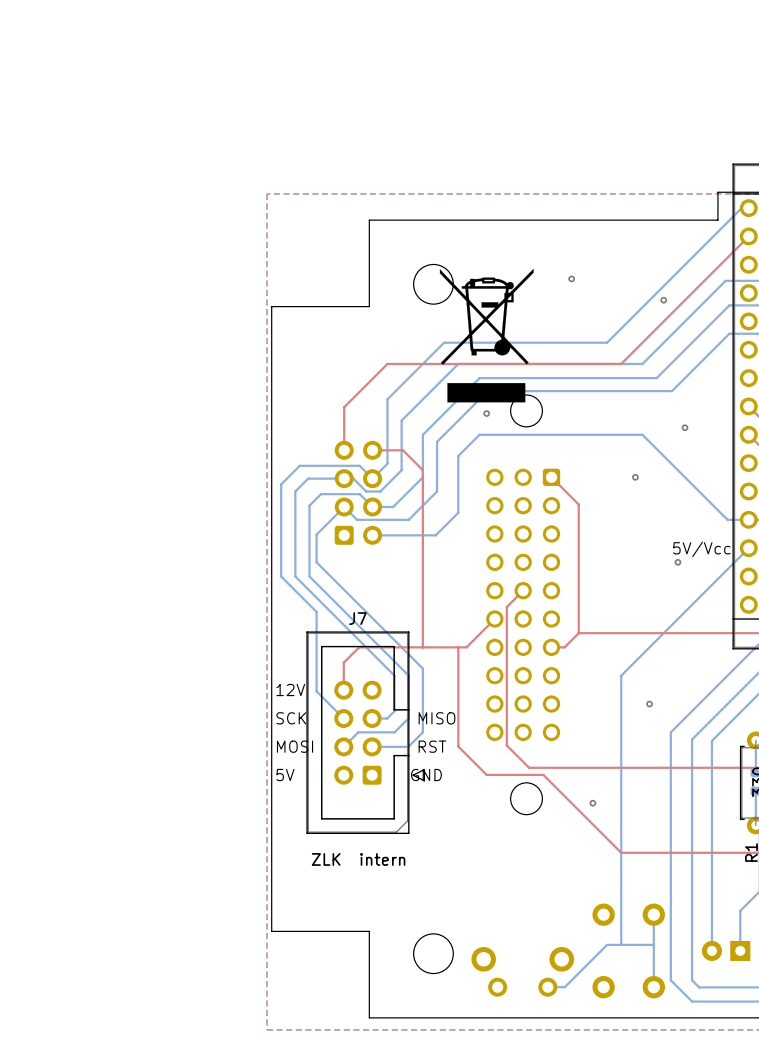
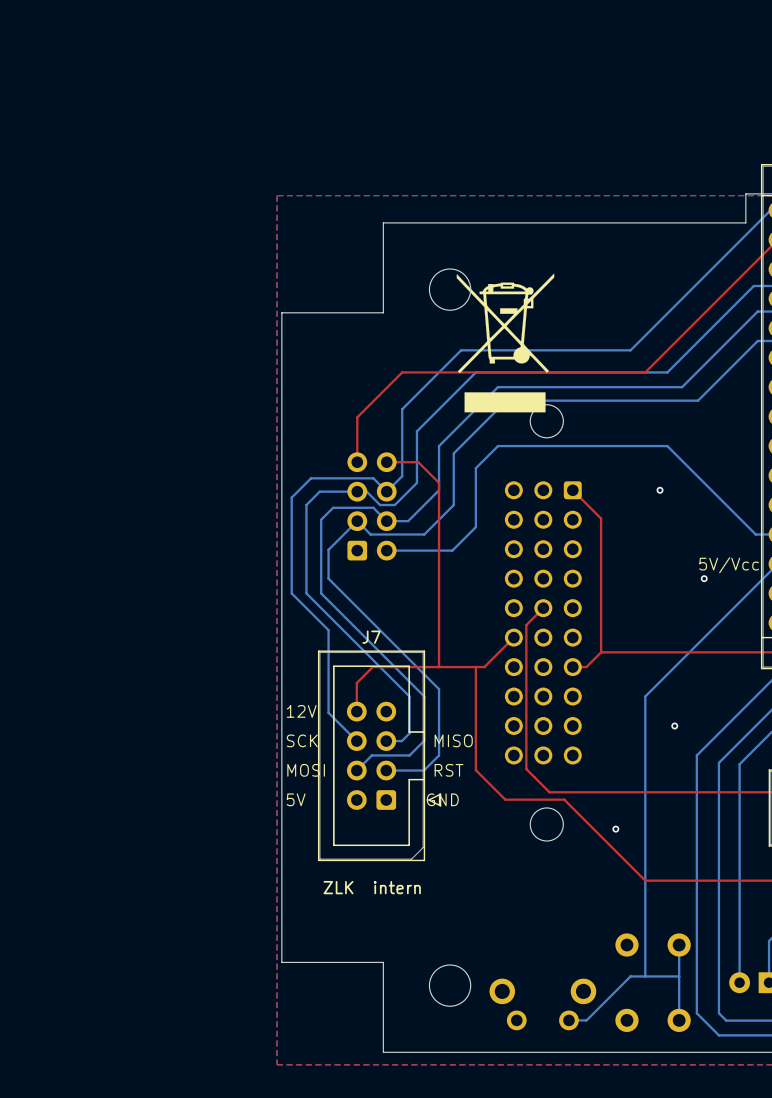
via: (571, 278) -> none
via: (663, 300) -> none
via: (486, 413) -> none
via: (685, 427) -> none

